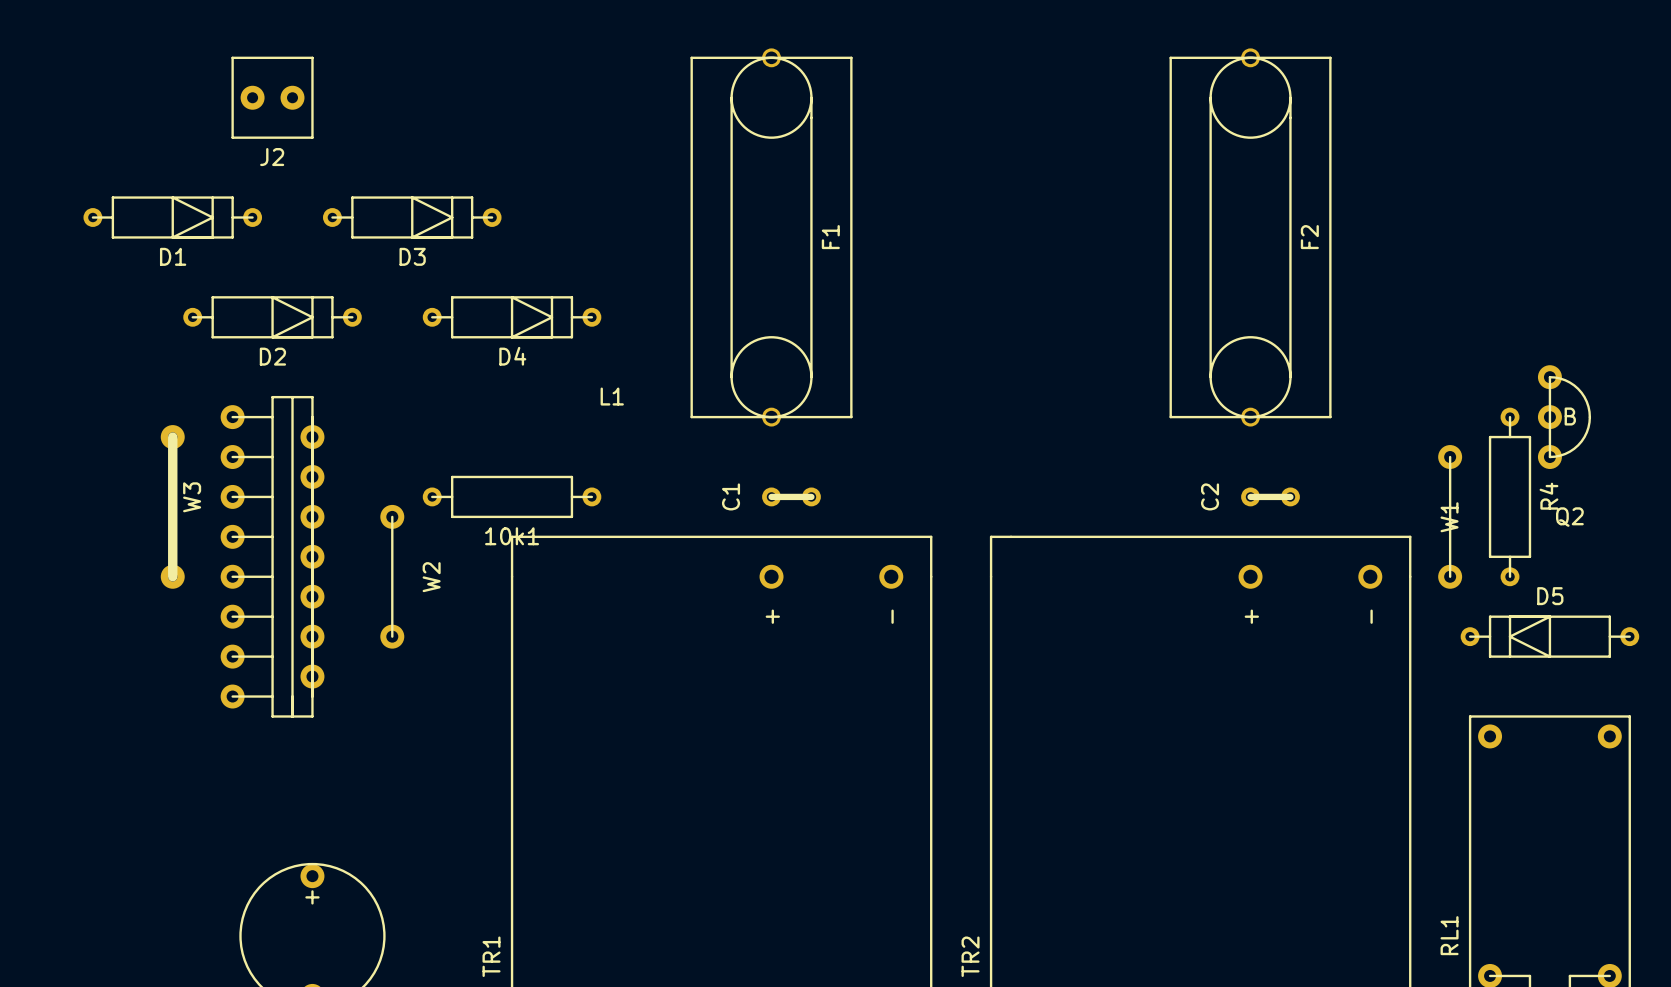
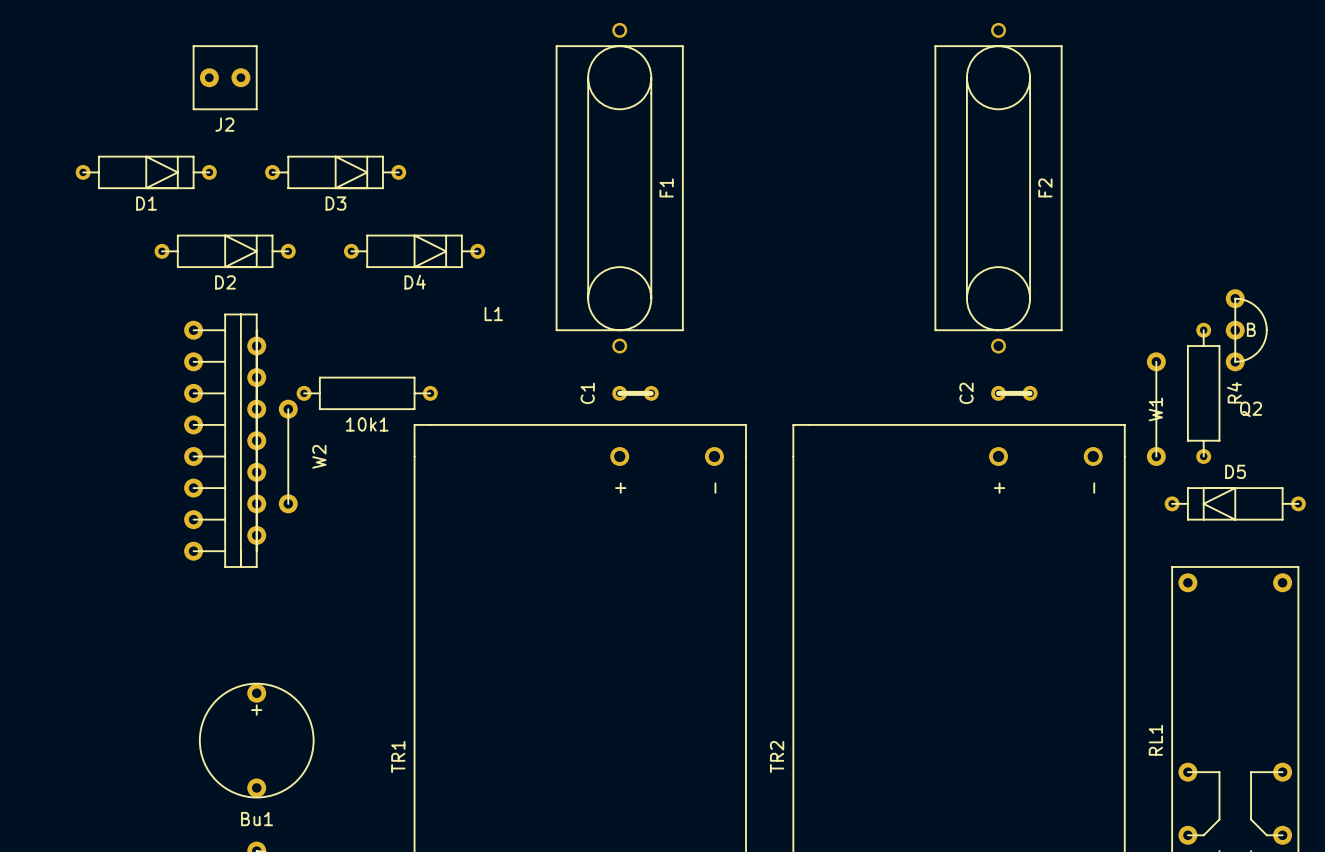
F1 footprint: [690, 48, 853, 427] -> [555, 22, 684, 354]
F2 footprint: [1169, 48, 1332, 427] -> [934, 22, 1063, 354]
10k1 position: (512, 496) -> (367, 393)
W3: (172, 506) -> none
W2 position: (392, 576) -> (288, 456)

